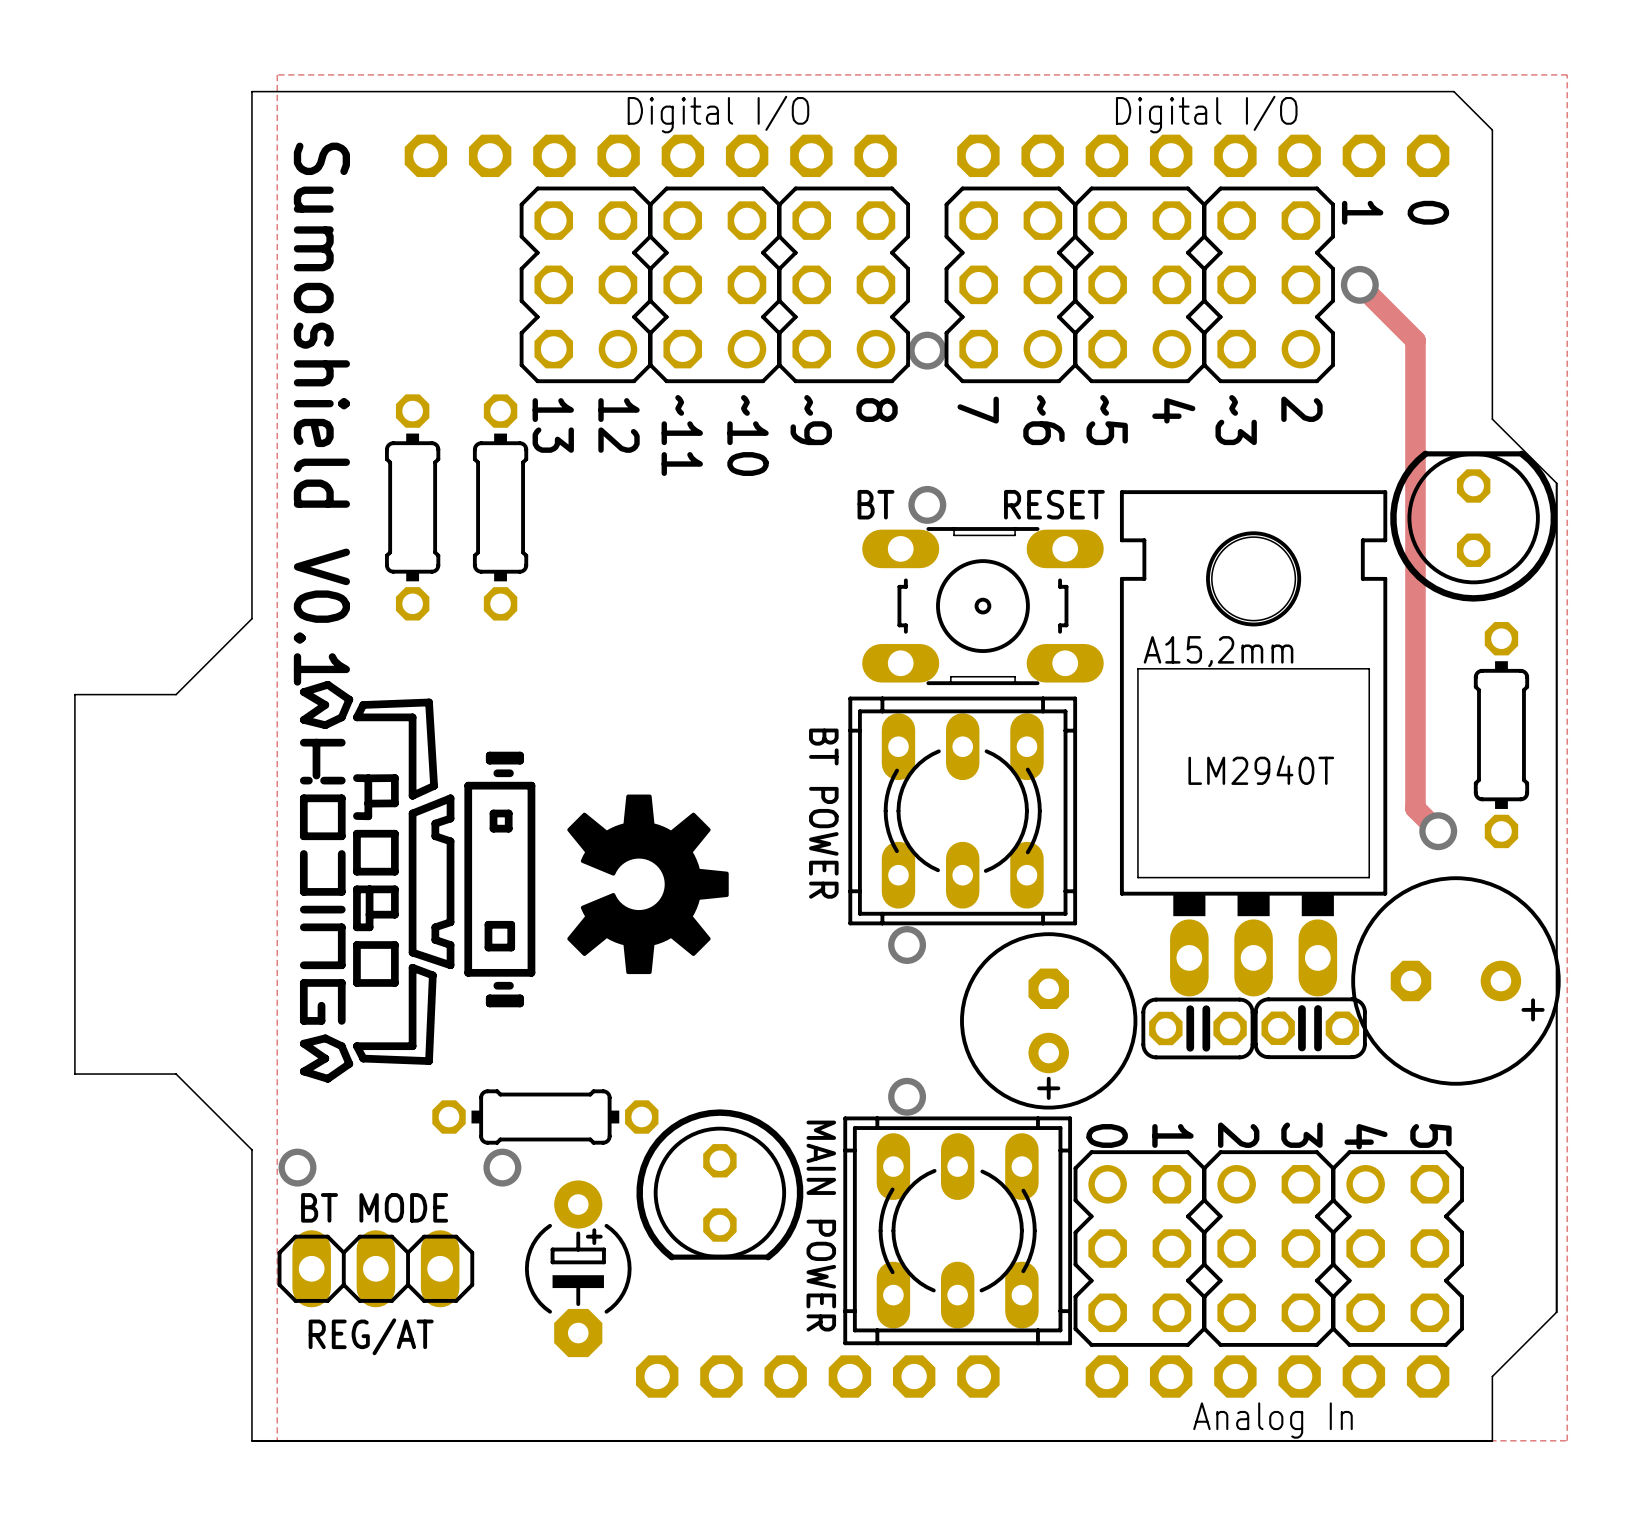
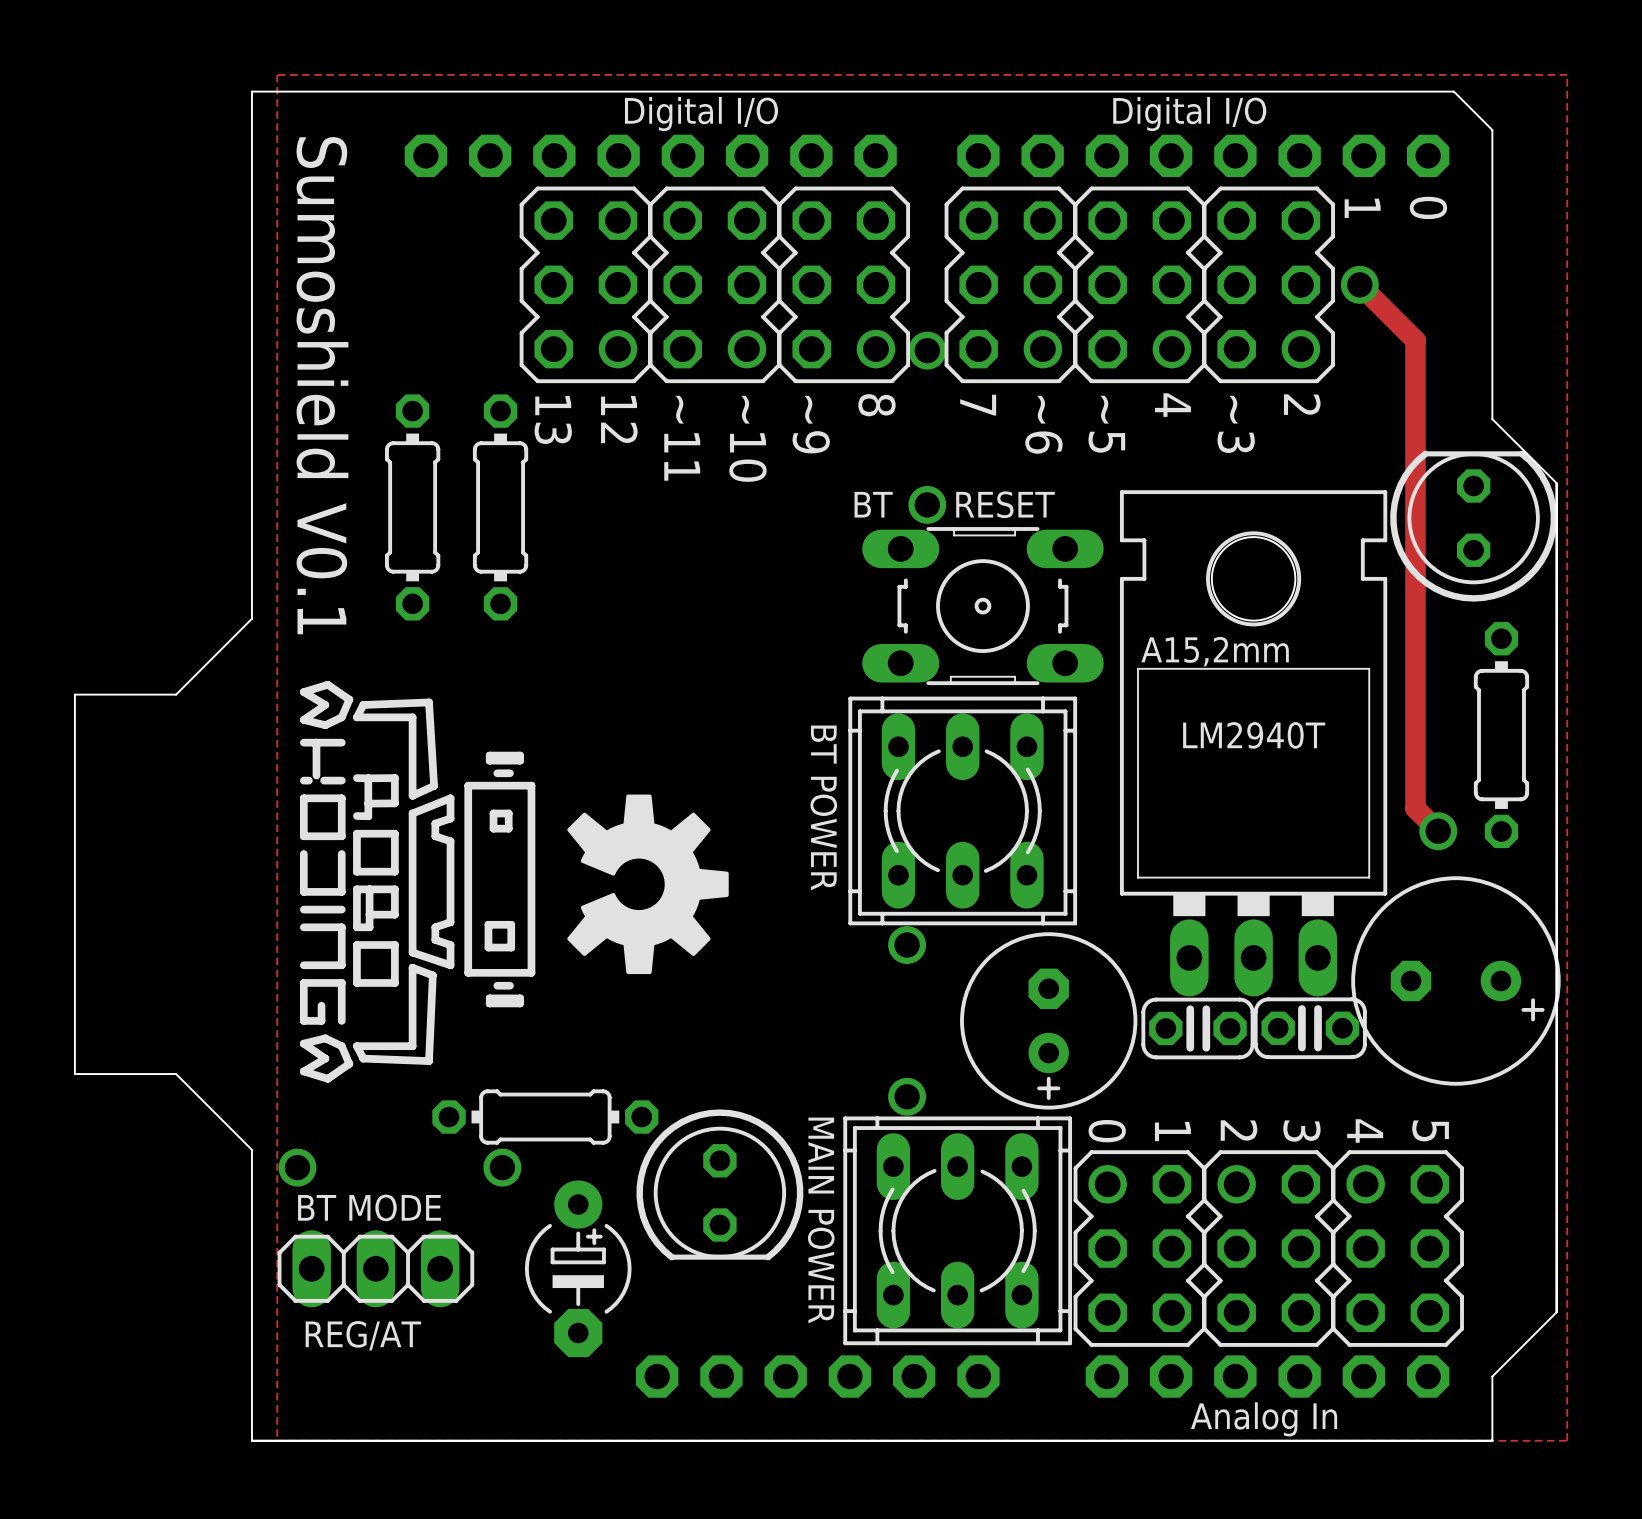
LM2940T name position: LM2940T (1261, 770) -> LM2940T (1254, 735)

